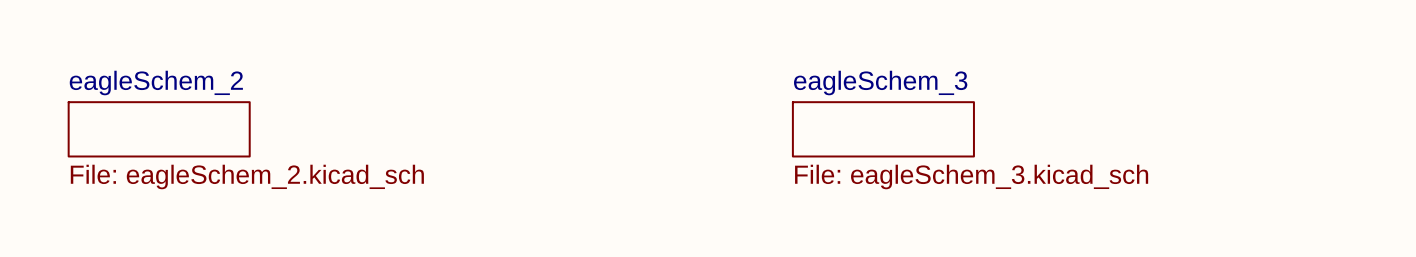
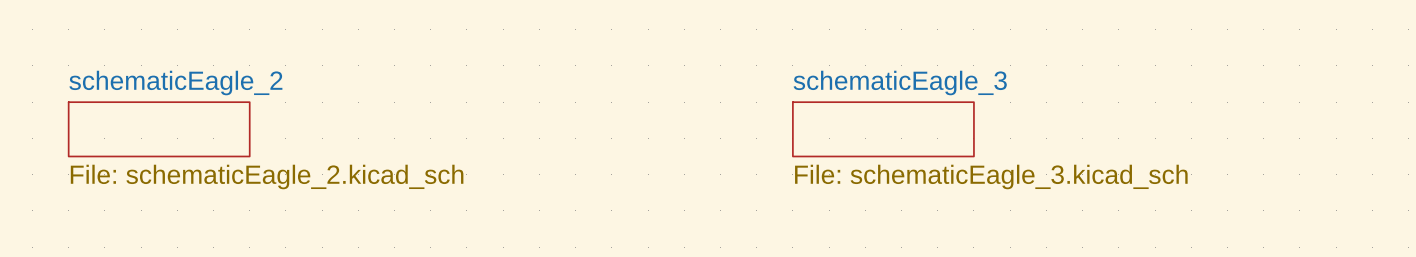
sheet eagleSchem_2 name: eagleSchem_2 (156, 83) -> schematicEagle_2 (175, 83)
sheet eagleSchem_3 name: eagleSchem_3 (880, 83) -> schematicEagle_3 (900, 83)
sheet eagleSchem_2 value: File: eagleSchem_2.kicad_sch (247, 176) -> File: schematicEagle_2.kicad_sch (267, 176)
sheet eagleSchem_3 value: File: eagleSchem_3.kicad_sch (971, 176) -> File: schematicEagle_3.kicad_sch (991, 176)

